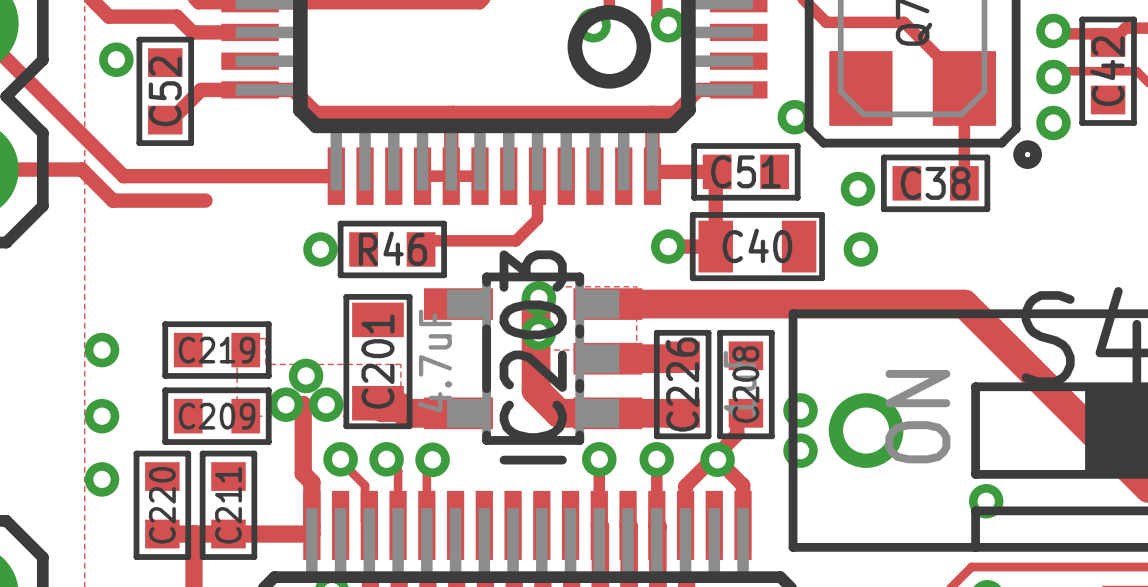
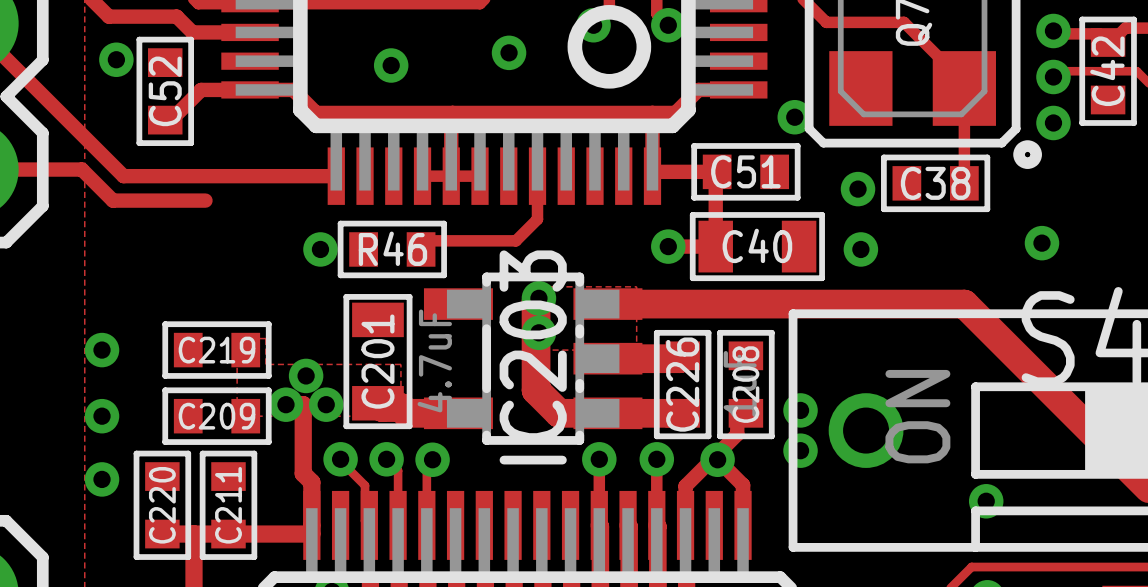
via: none -> (509, 52)
via: none -> (391, 65)
via: none -> (1041, 243)

